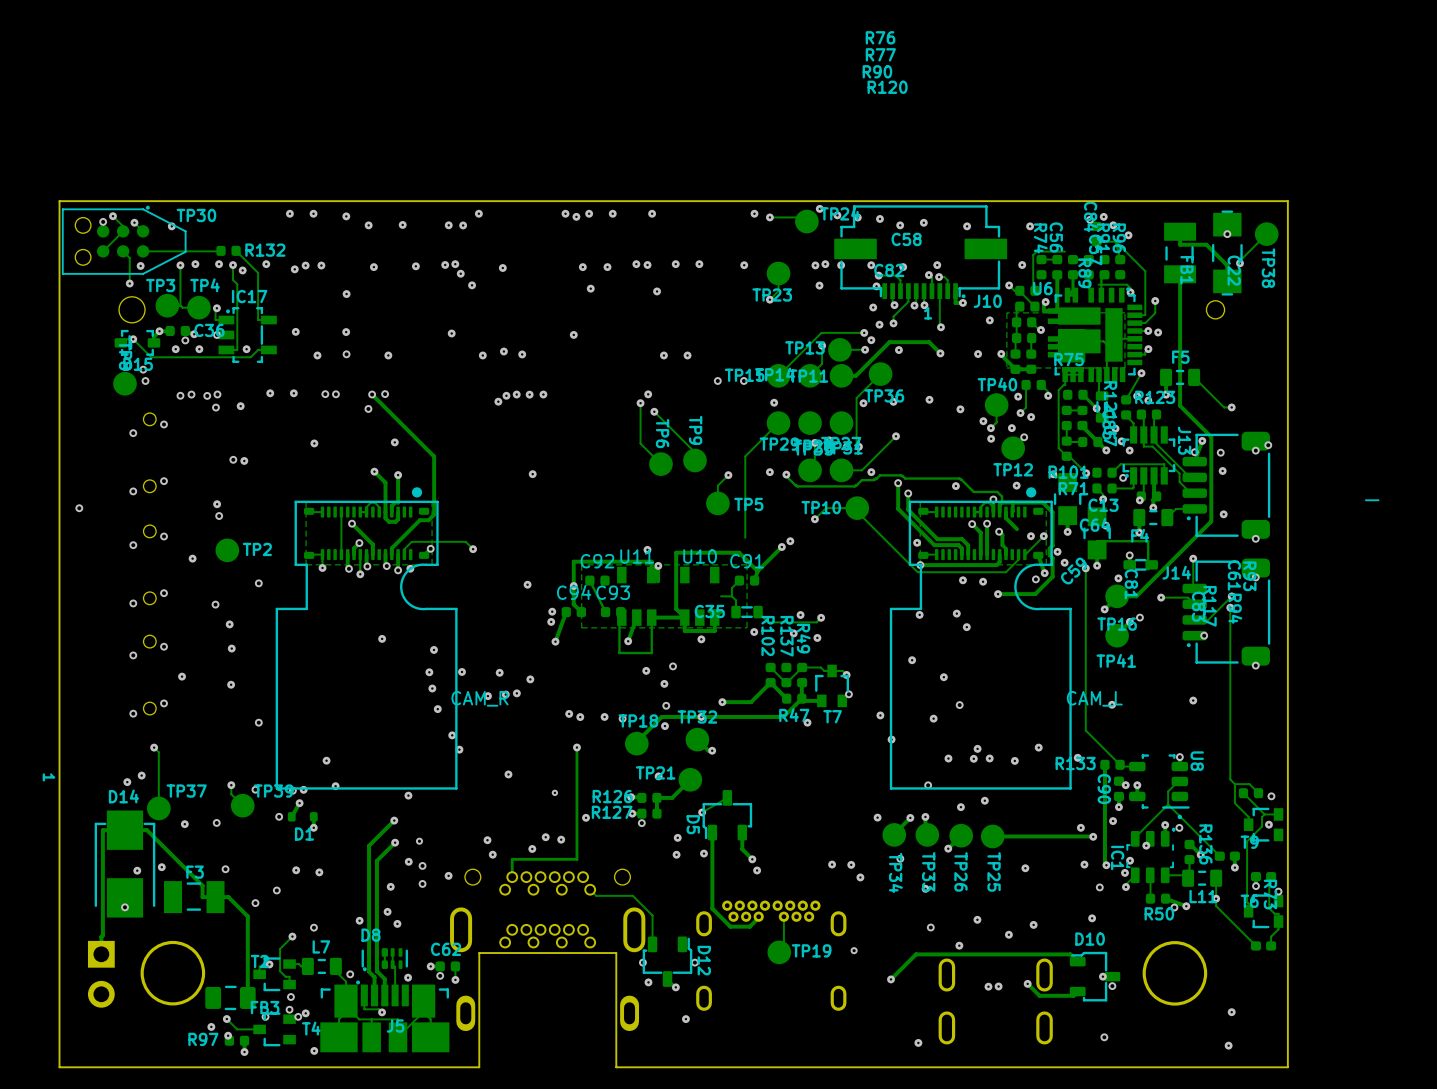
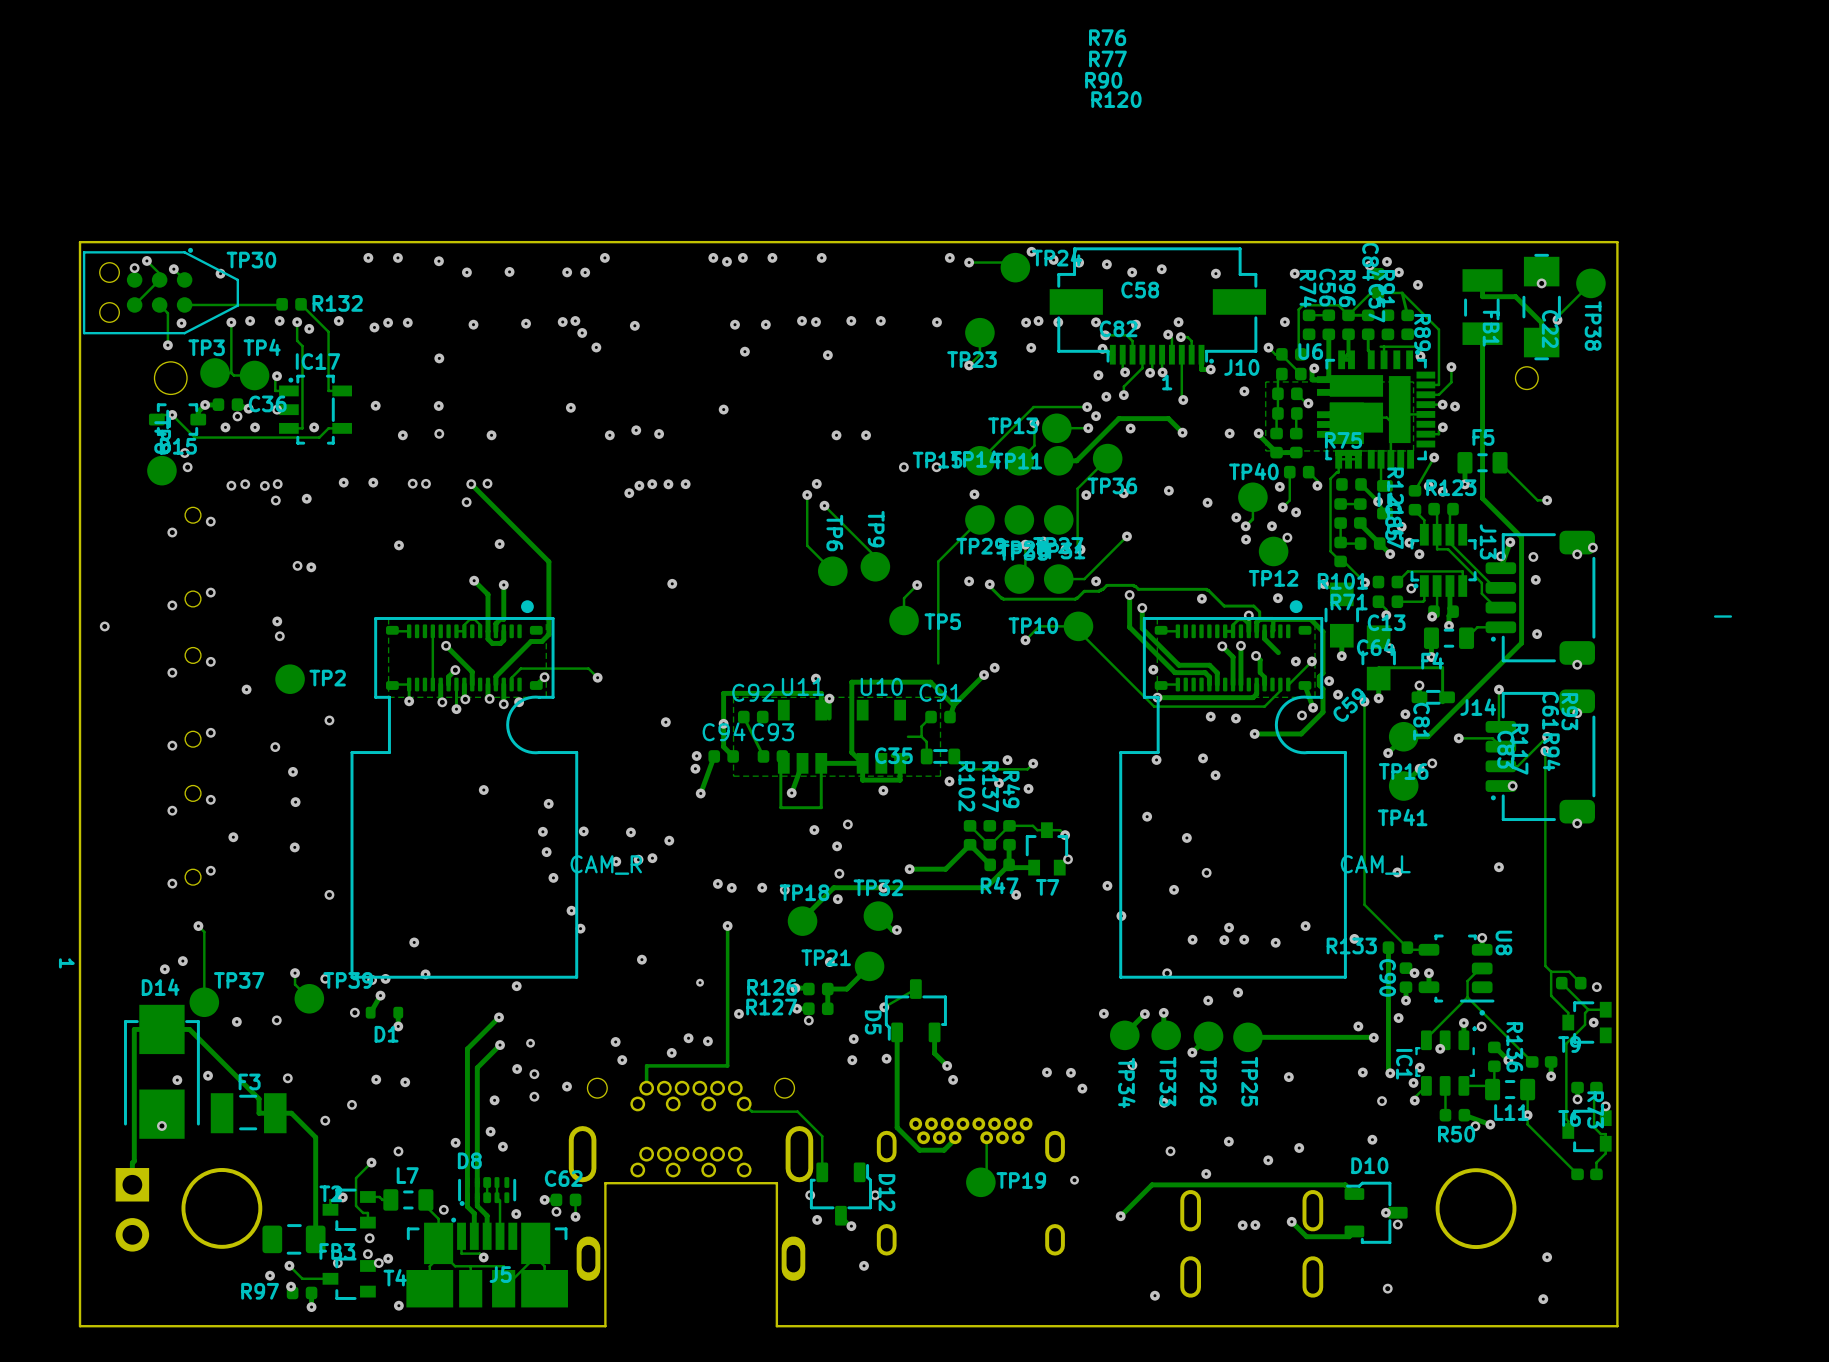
R96 name: R96 (1119, 238) -> R89 (1422, 332)
track: none -> (1370, 292) (1348, 315) (1338, 305)
R89 name: R89 (1084, 273) -> R96 (1347, 288)
track: (1104, 274) (1101, 277) (1101, 284) -> none

